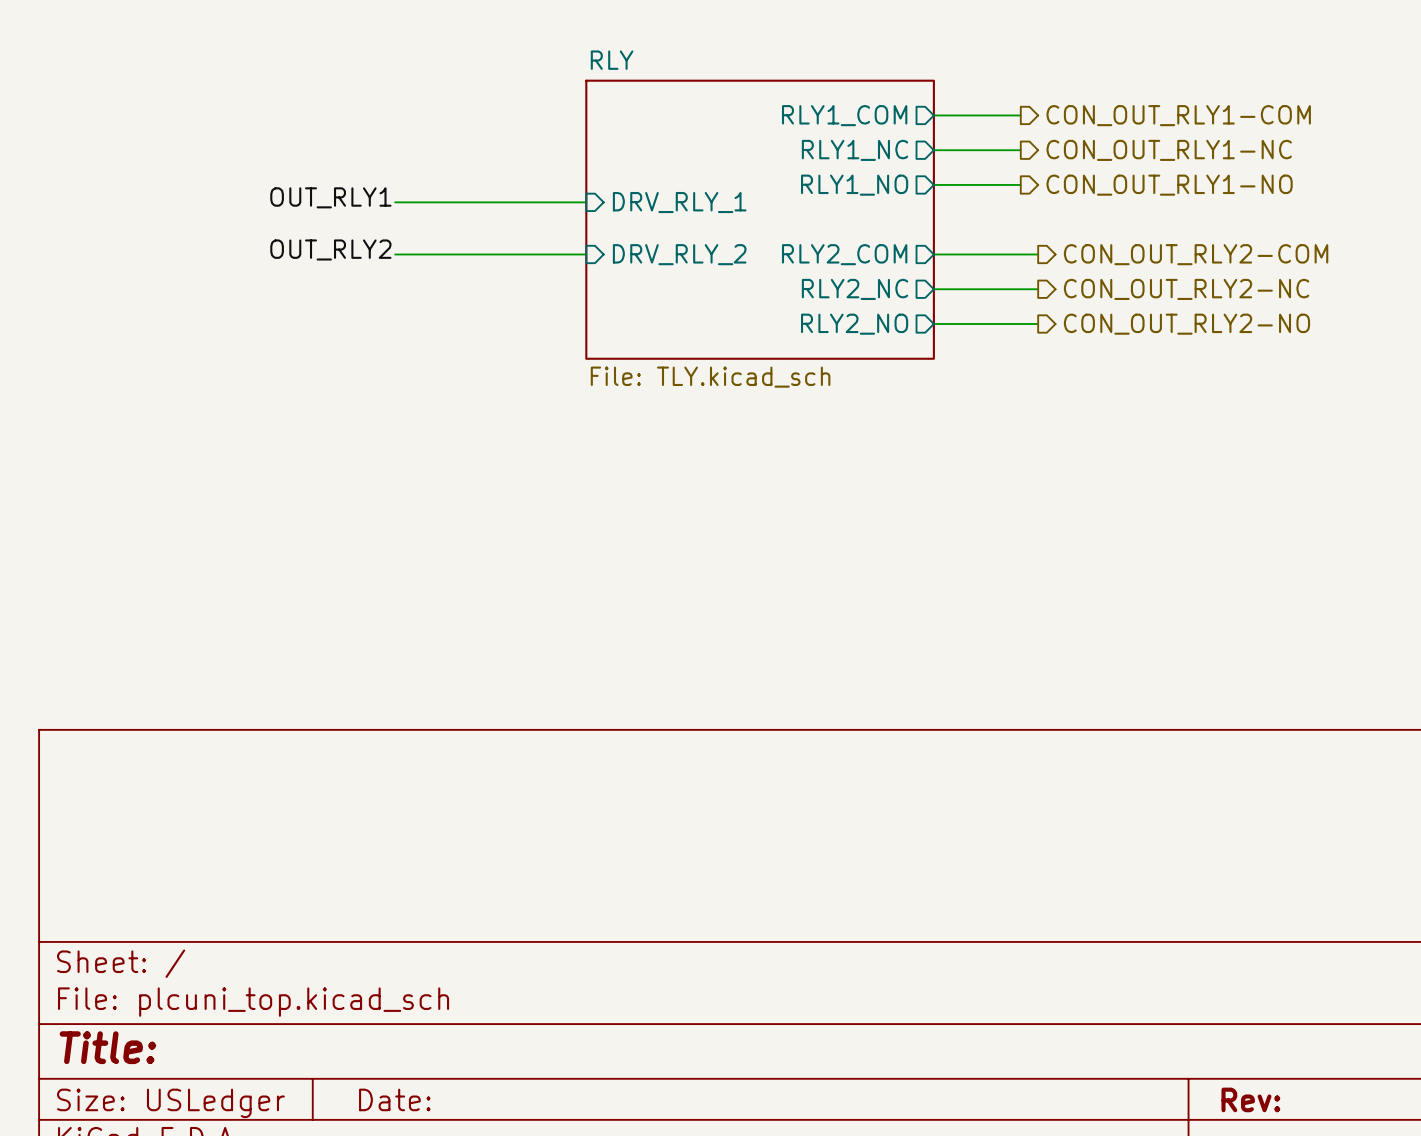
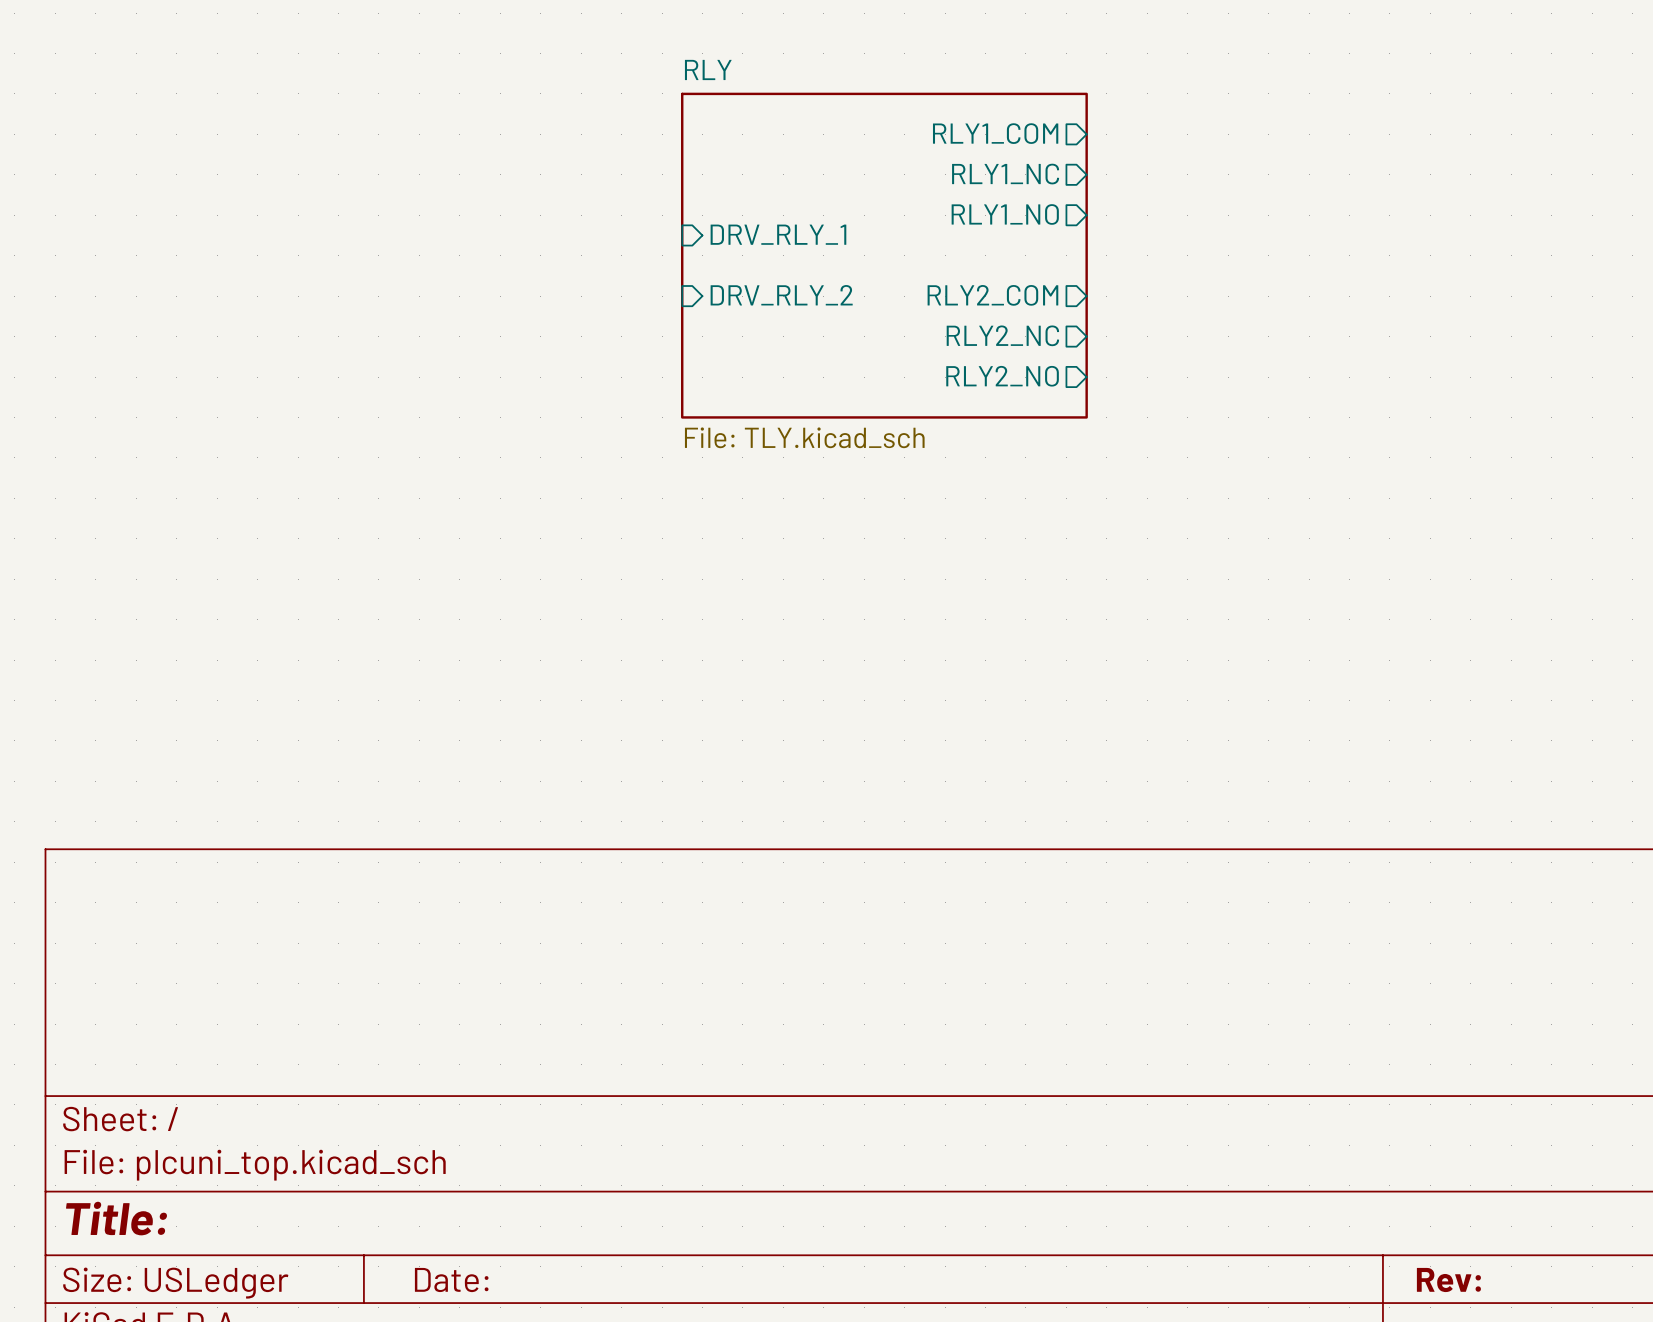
wire: (933, 115) (1020, 115) -> none
hierarchical label: CON_OUT_RLY1-COM (1178, 115) -> none
wire: (933, 150) (1020, 150) -> none
hierarchical label: CON_OUT_RLY1-NC (1169, 150) -> none
wire: (933, 184) (1020, 184) -> none
hierarchical label: CON_OUT_RLY1-NO (1169, 185) -> none
label: OUT_RLY1 (330, 197) -> none
wire: (395, 202) (586, 202) -> none
label: OUT_RLY2 (330, 249) -> none
wire: (395, 254) (586, 254) -> none
wire: (933, 254) (1038, 254) -> none
hierarchical label: CON_OUT_RLY2-COM (1196, 254) -> none
wire: (933, 289) (1038, 289) -> none
hierarchical label: CON_OUT_RLY2-NC (1186, 289) -> none
wire: (933, 324) (1038, 324) -> none
hierarchical label: CON_OUT_RLY2-NO (1186, 324) -> none

